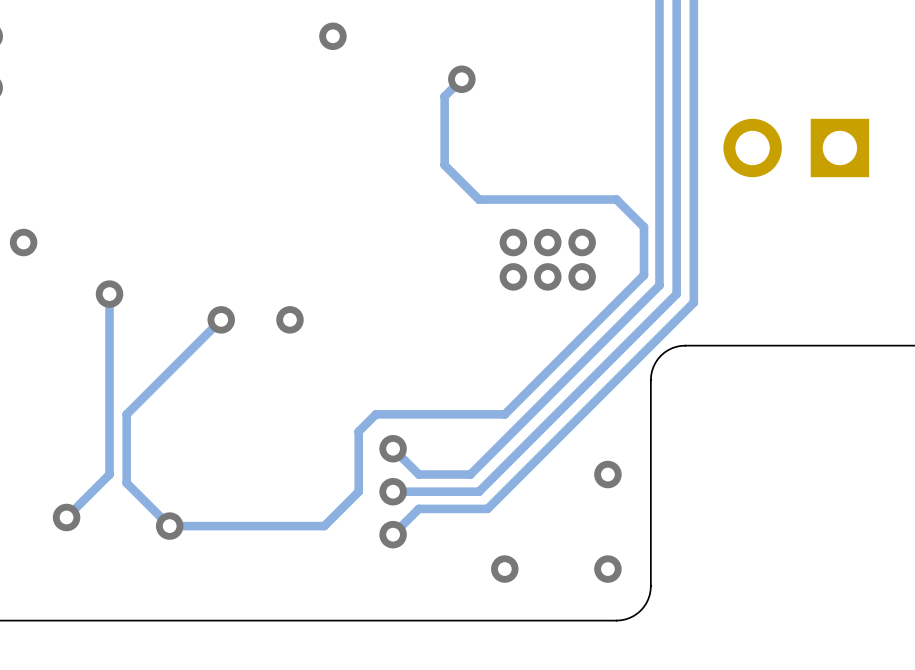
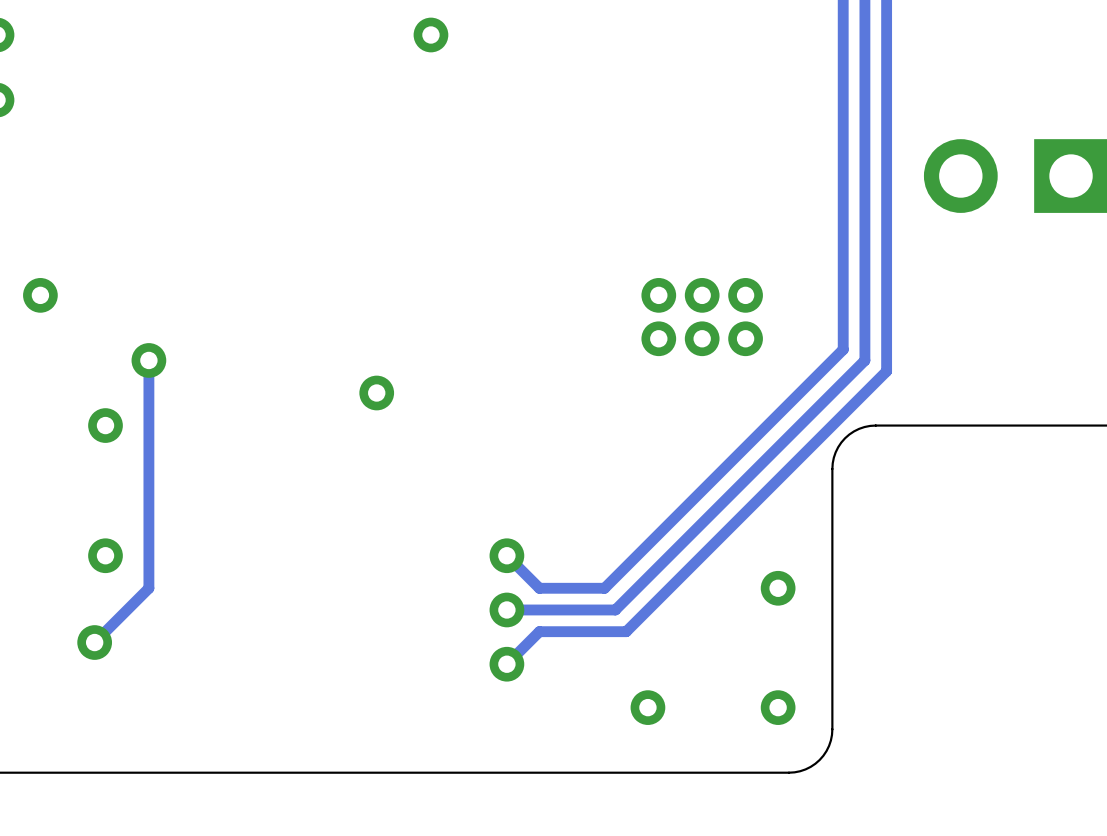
track: (461, 79) (444, 96) (444, 165) (479, 199) (616, 199) (644, 227) (644, 275) (504, 414) (375, 414) (358, 431) (358, 491) (324, 526) (169, 526) (126, 483) (126, 414) (221, 319) -> none
via: (461, 79) -> none
via: (221, 319) -> none
via: none -> (105, 425)
via: none -> (105, 555)
via: (169, 526) -> none

